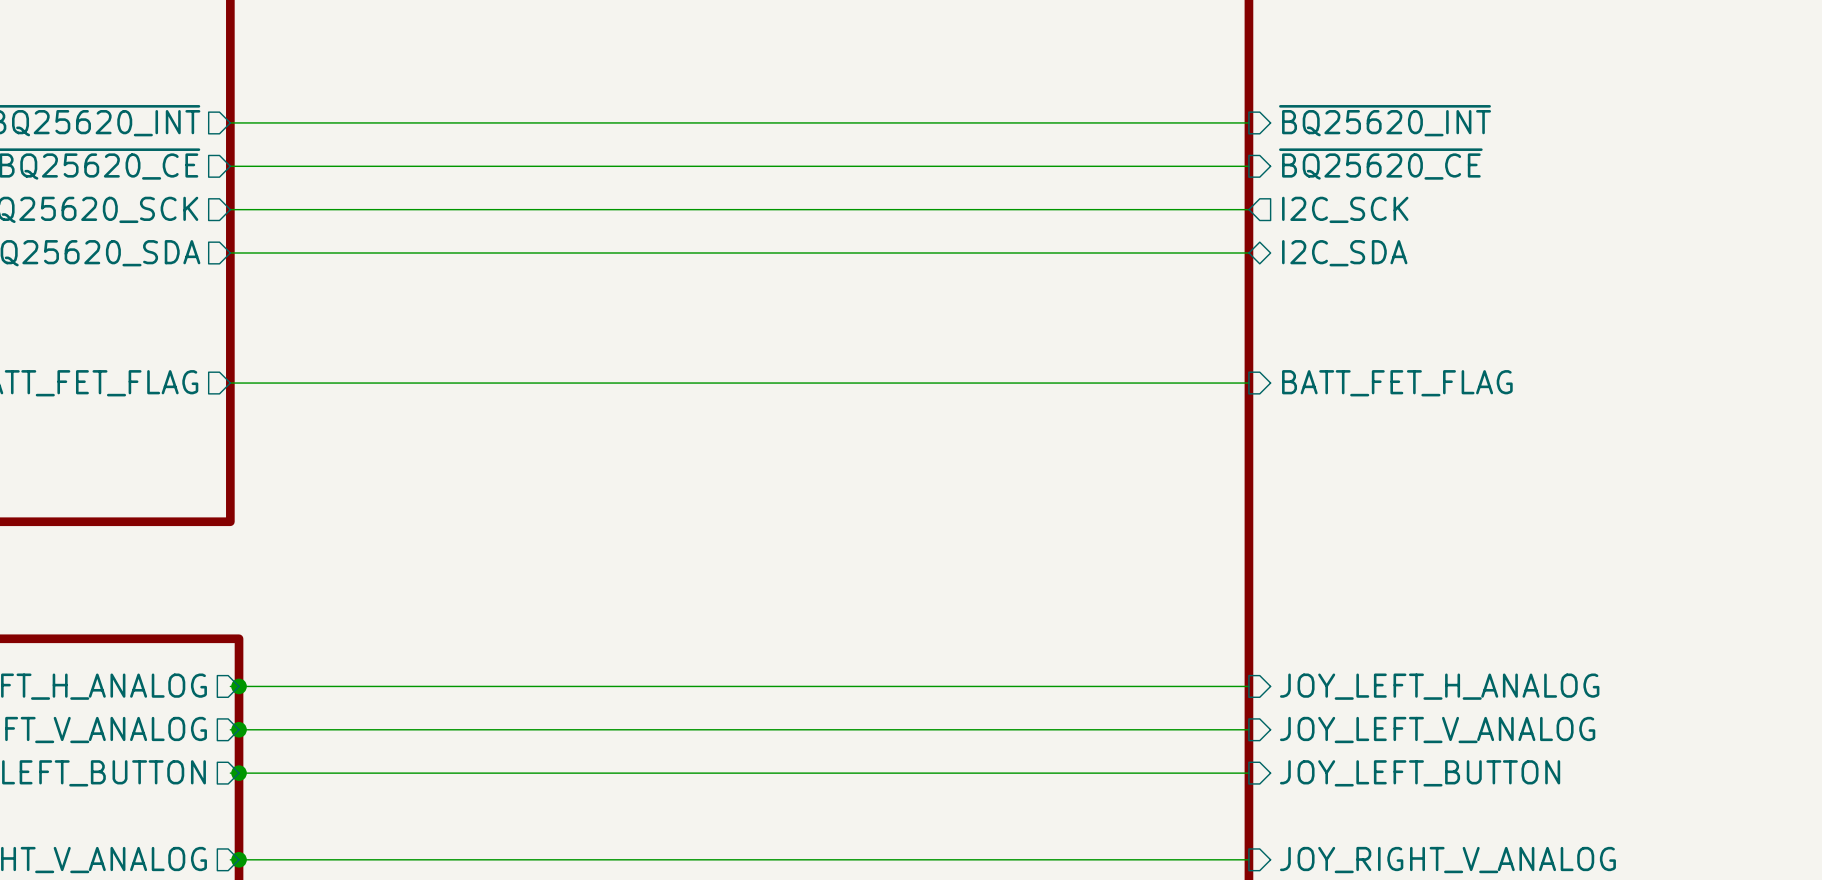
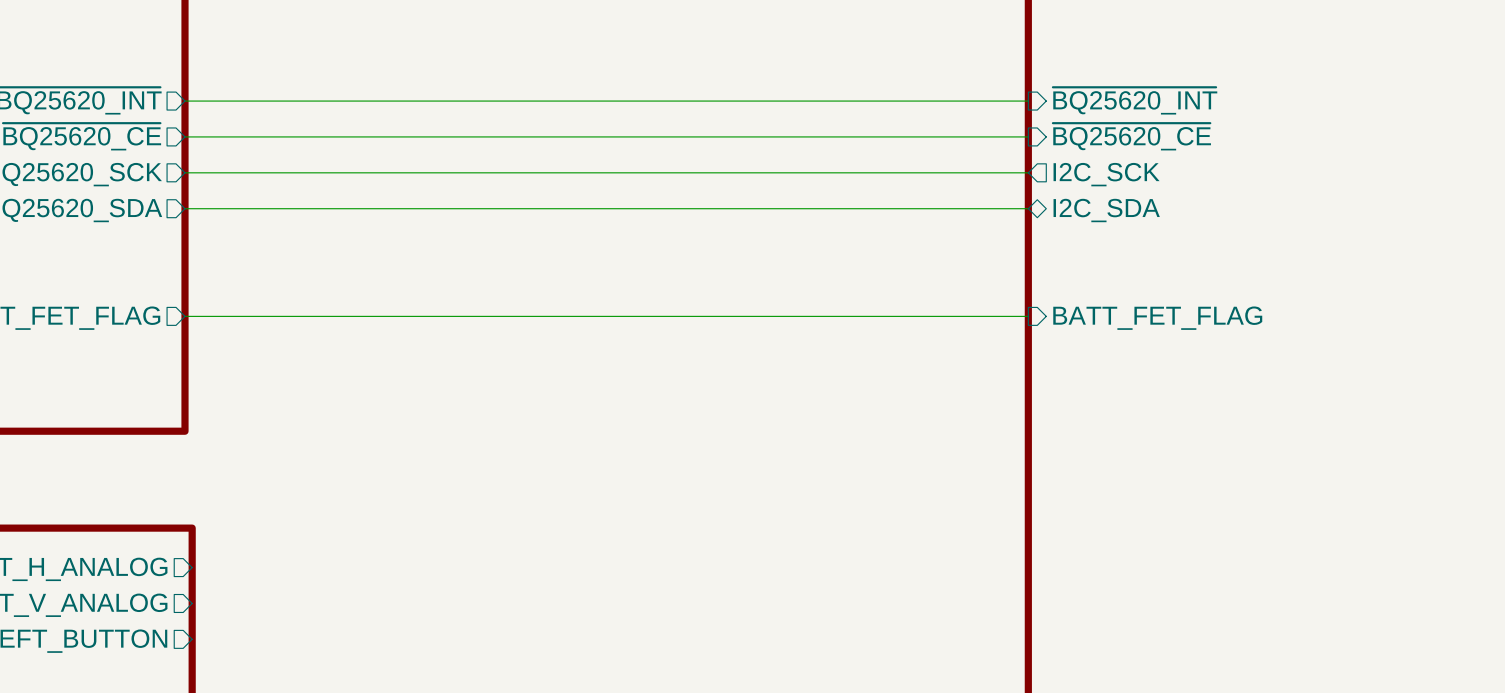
wire: (230, 686) (1248, 686) -> none
junction: (239, 686) -> none
sheet pin: JOY_LEFT_H_ANALOG (1439, 686) -> none
wire: (230, 729) (1248, 729) -> none
junction: (239, 729) -> none
sheet pin: JOY_LEFT_V_ANALOG (1437, 730) -> none
wire: (230, 773) (1248, 773) -> none
junction: (239, 773) -> none
sheet pin: JOY_LEFT_BUTTON (1420, 773) -> none

